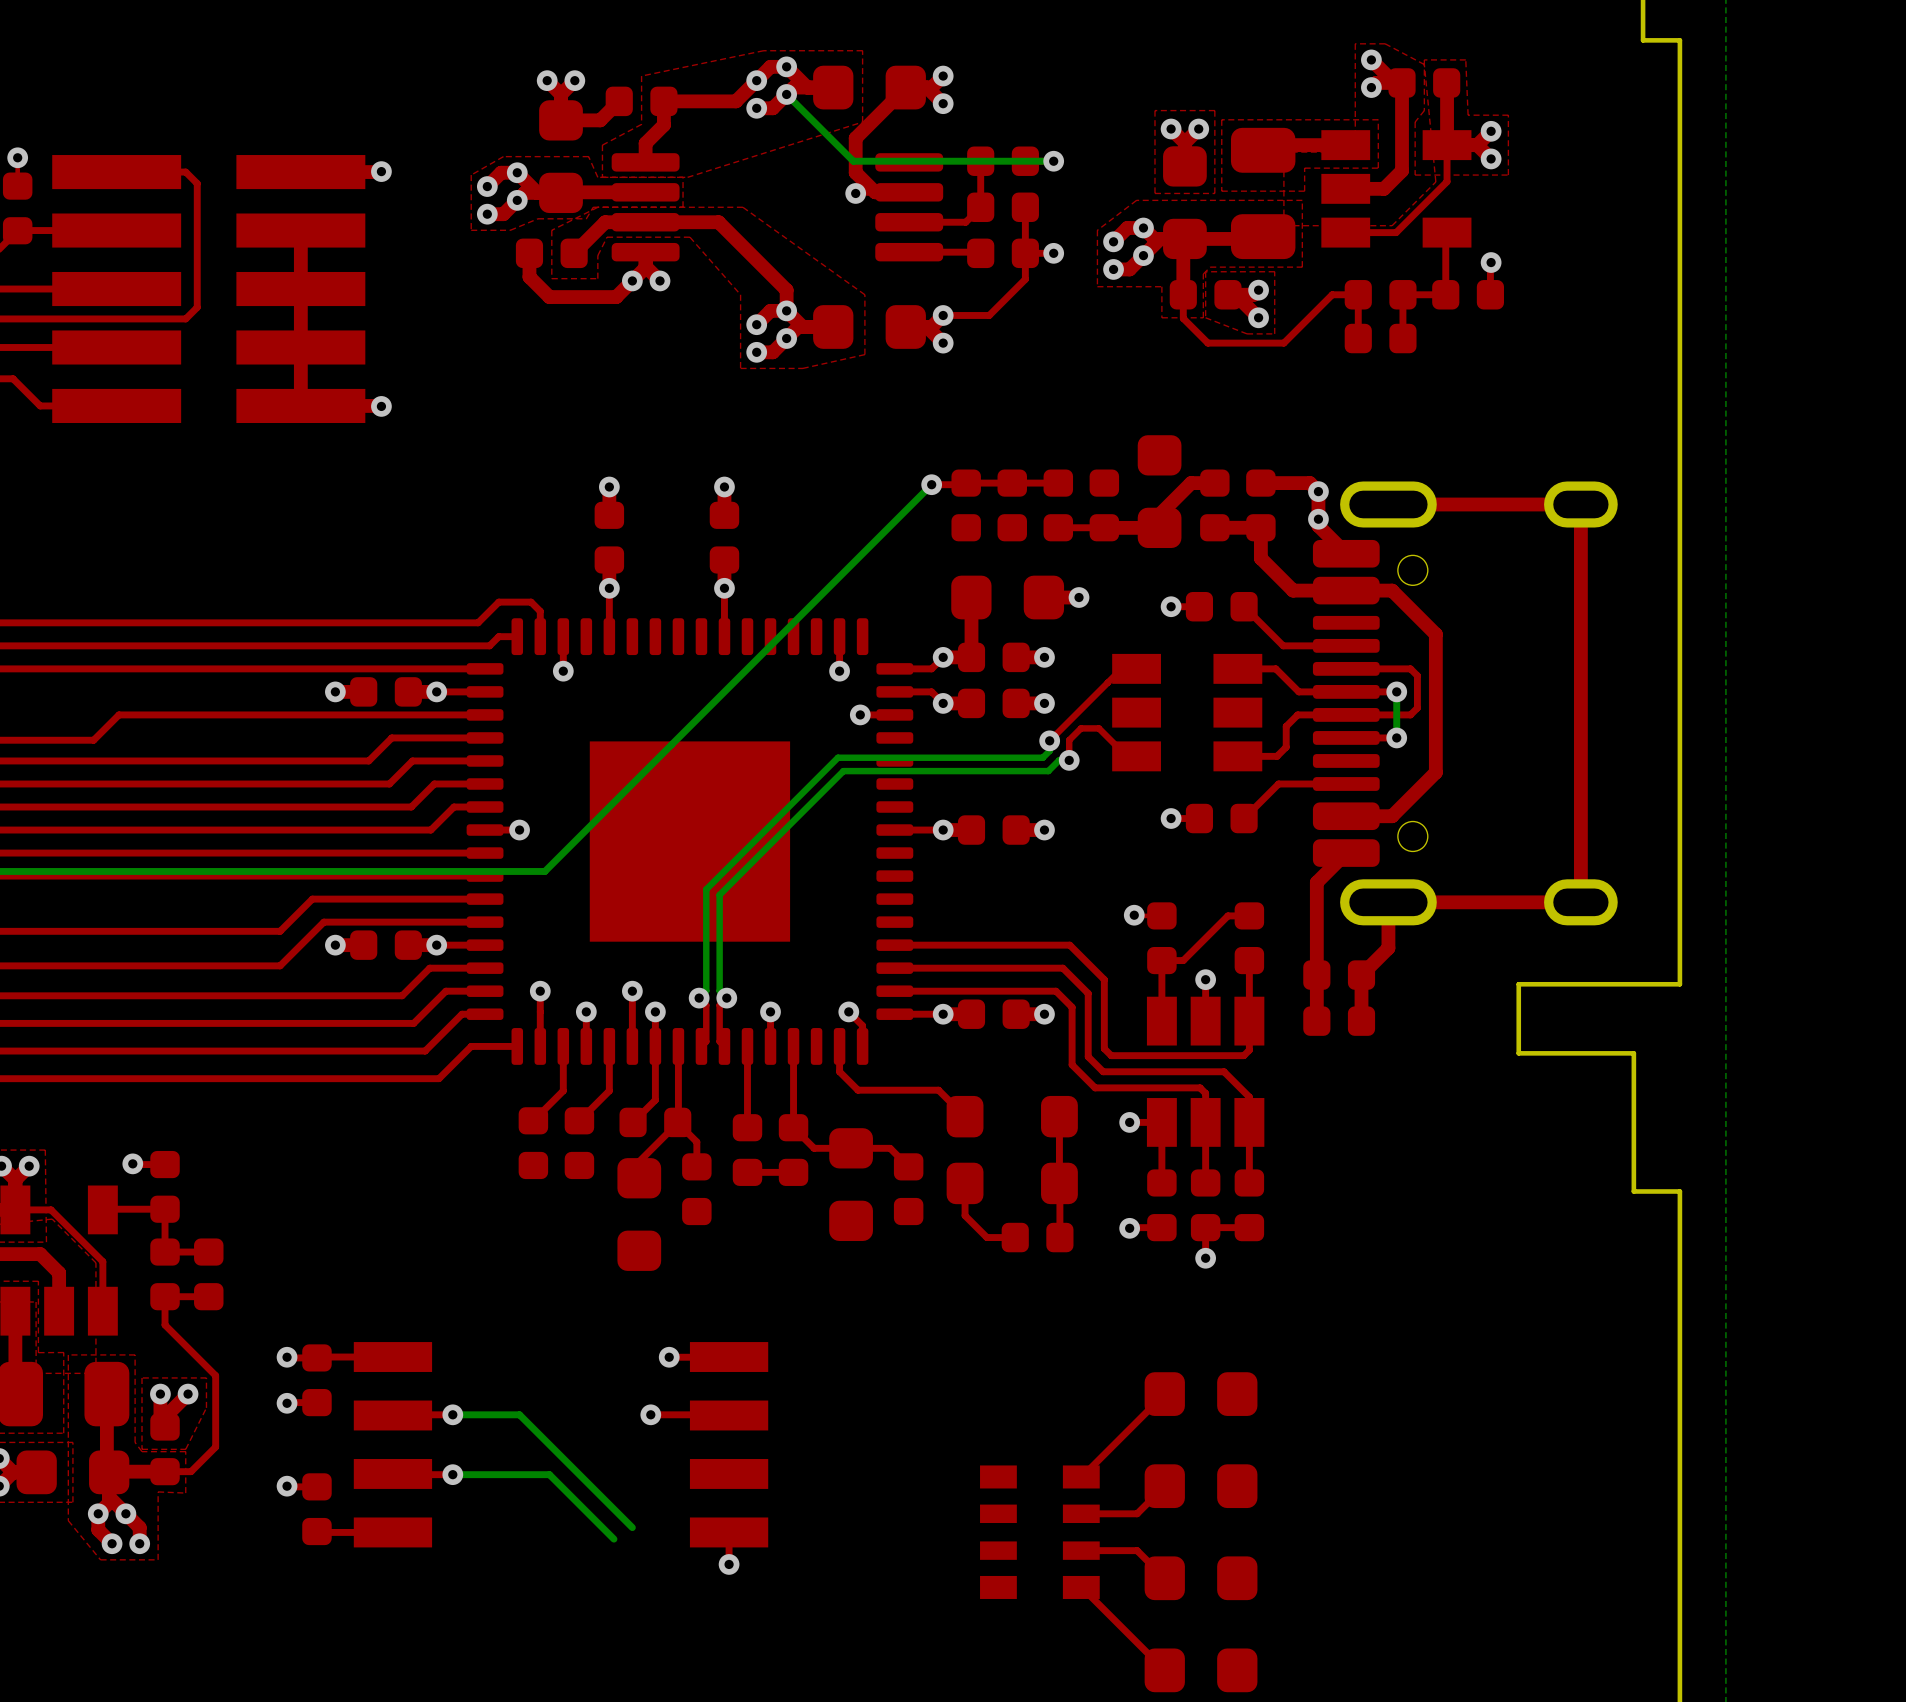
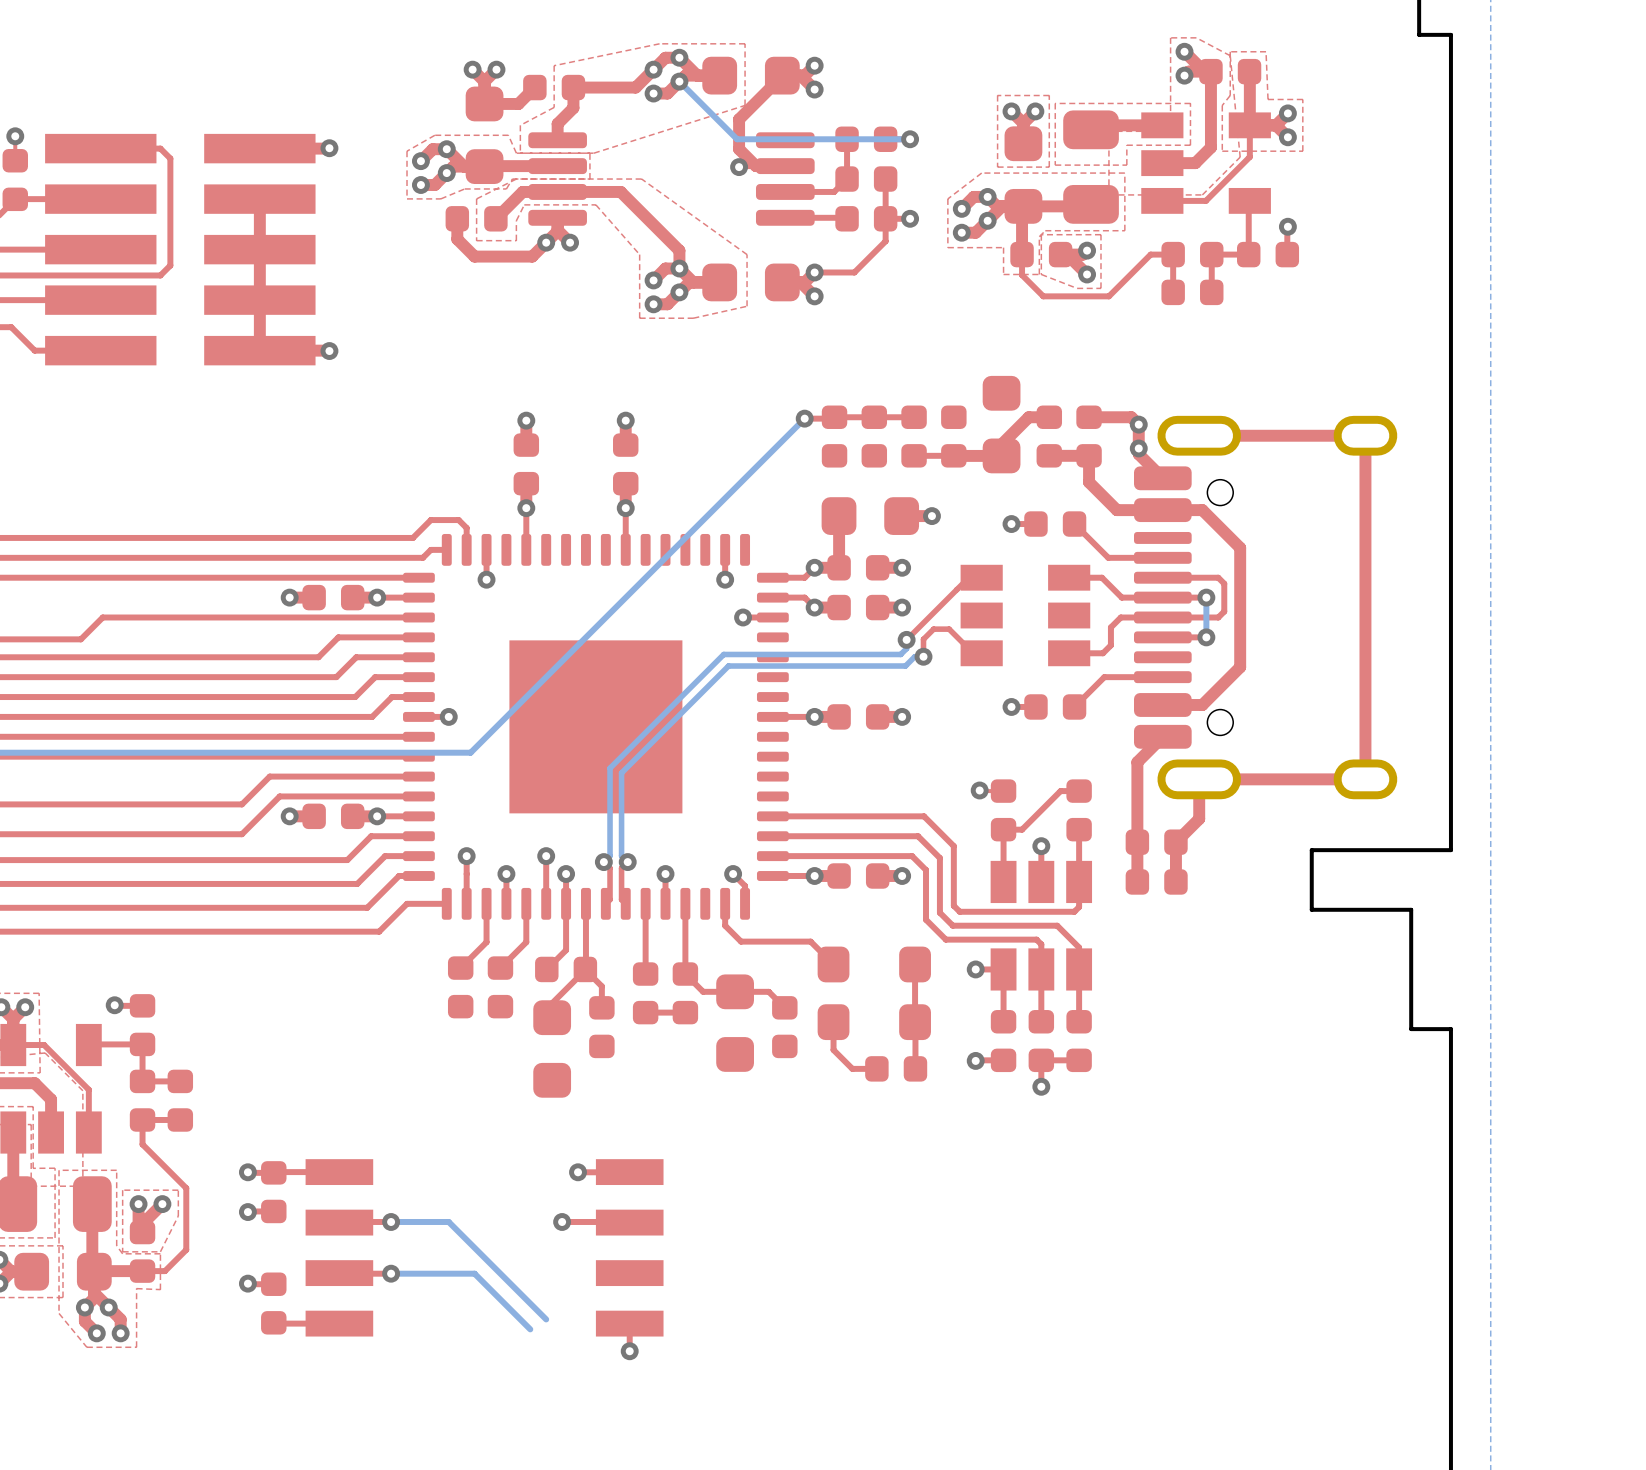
top track: (1164, 1394) (1081, 1476) -> none
part: (1201, 1394) -> none
top track: (1164, 1486) (1137, 1513) (1081, 1513) -> none
part: (1201, 1486) -> none
part: (1039, 1532) -> none
top track: (1081, 1550) (1137, 1550) (1164, 1578) -> none
part: (1201, 1578) -> none
top track: (1081, 1587) (1164, 1670) -> none
part: (1201, 1670) -> none

